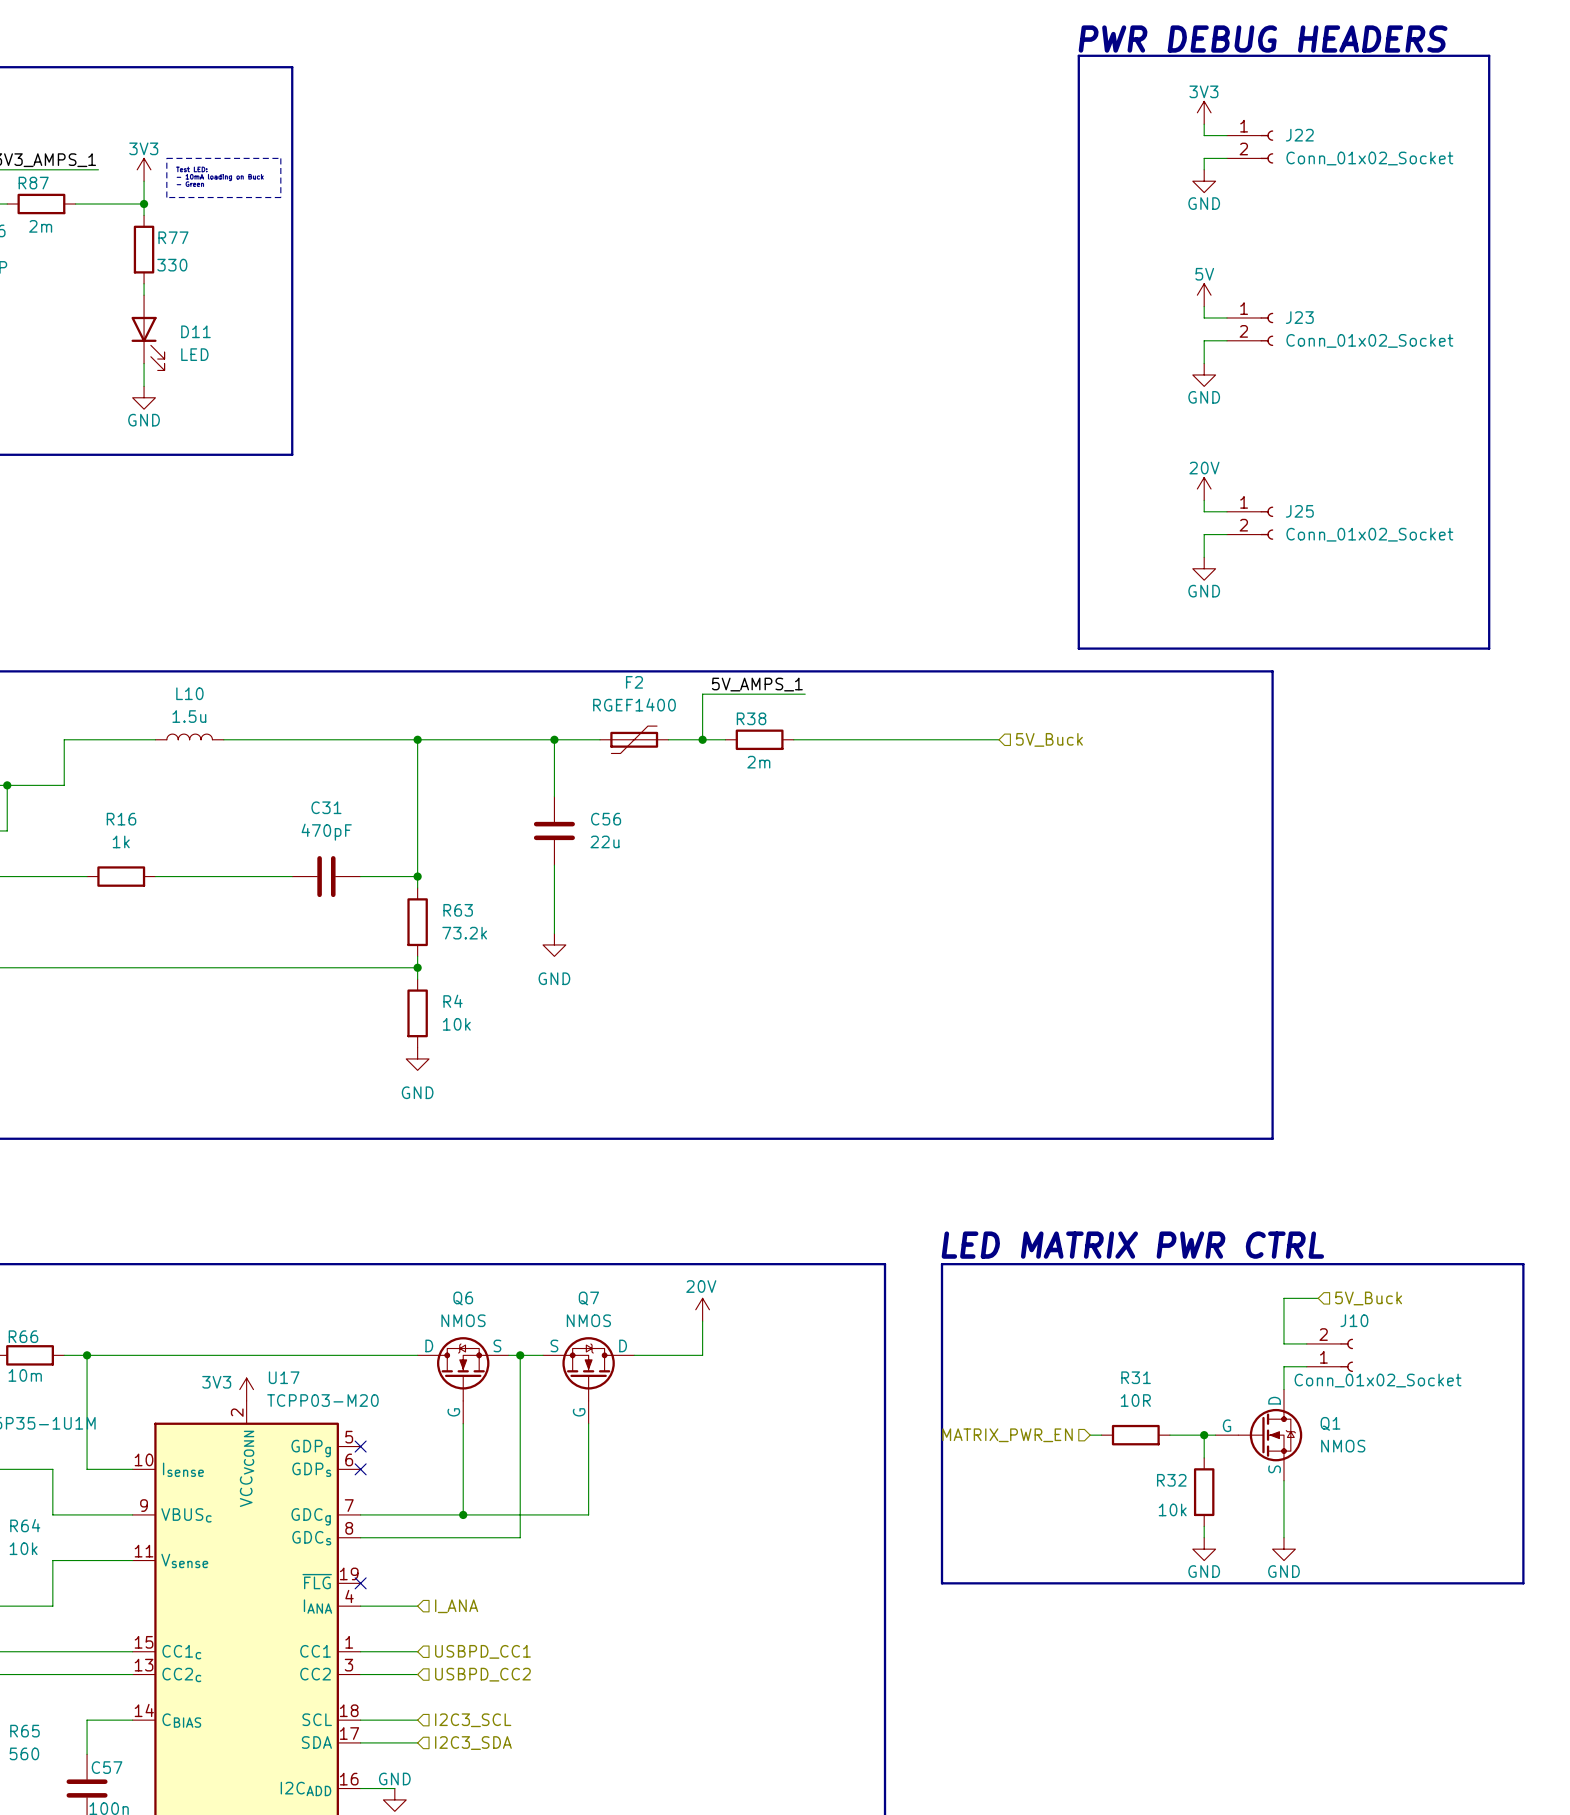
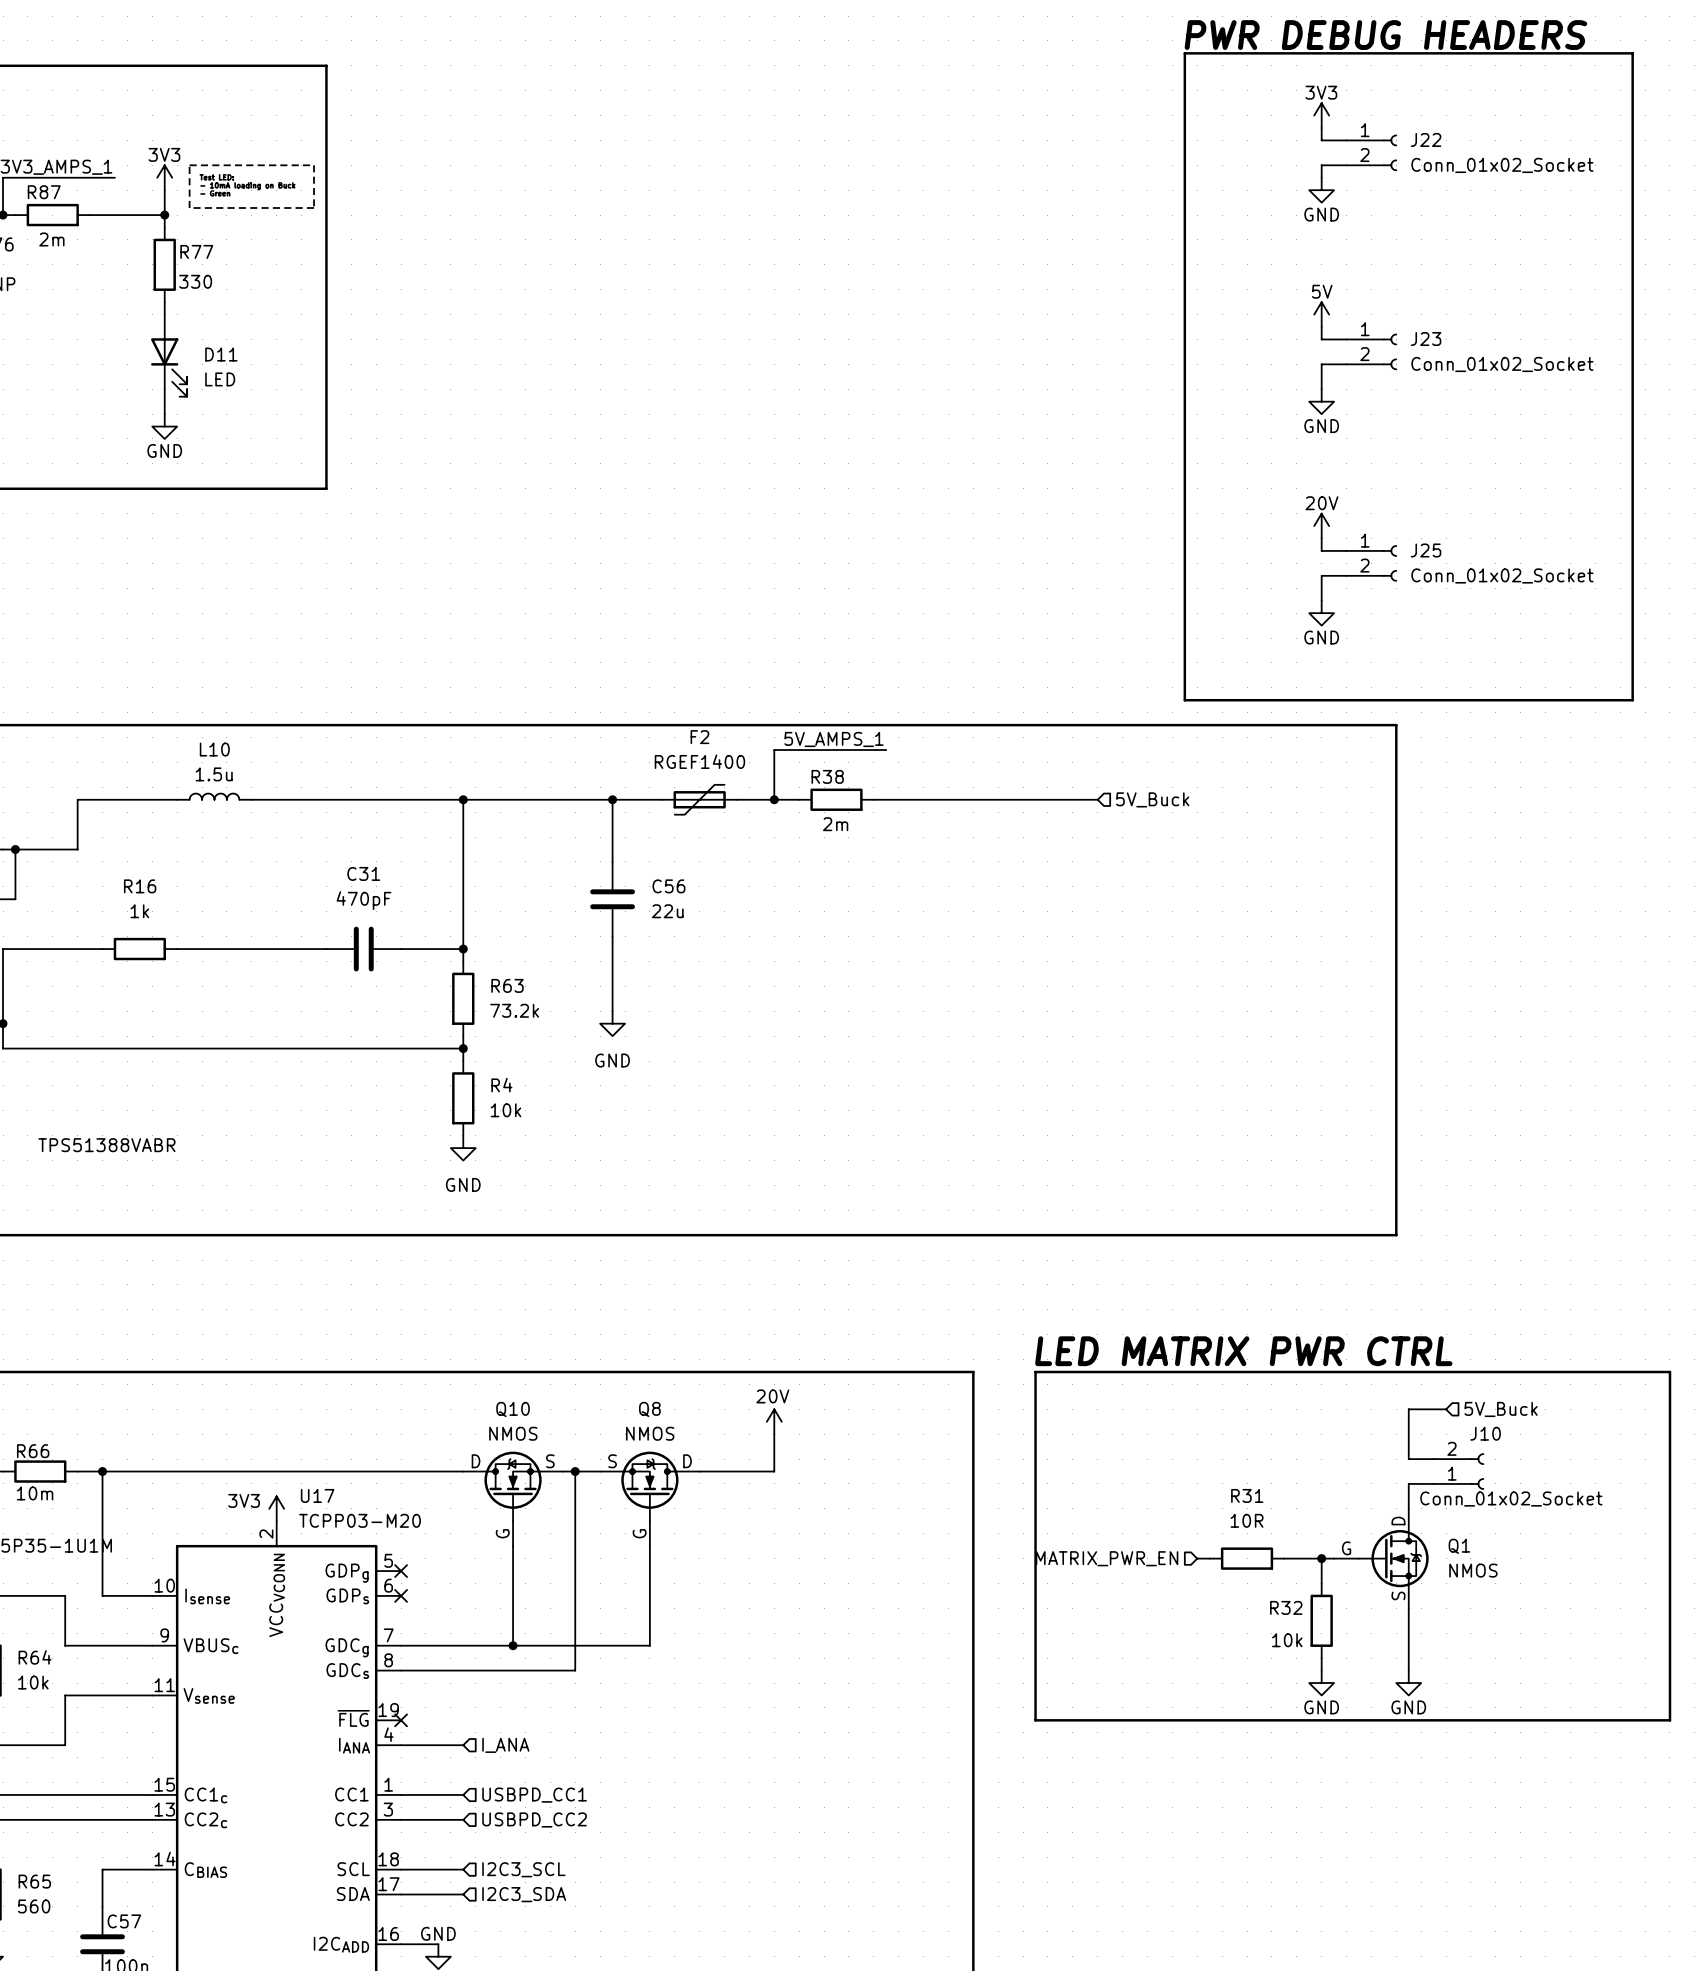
text: none -> TPS51388VABR (106, 1145)
Q6 name: Q6 (463, 1298) -> Q10 (513, 1409)
Q7 name: Q7 (588, 1298) -> Q8 (649, 1409)

